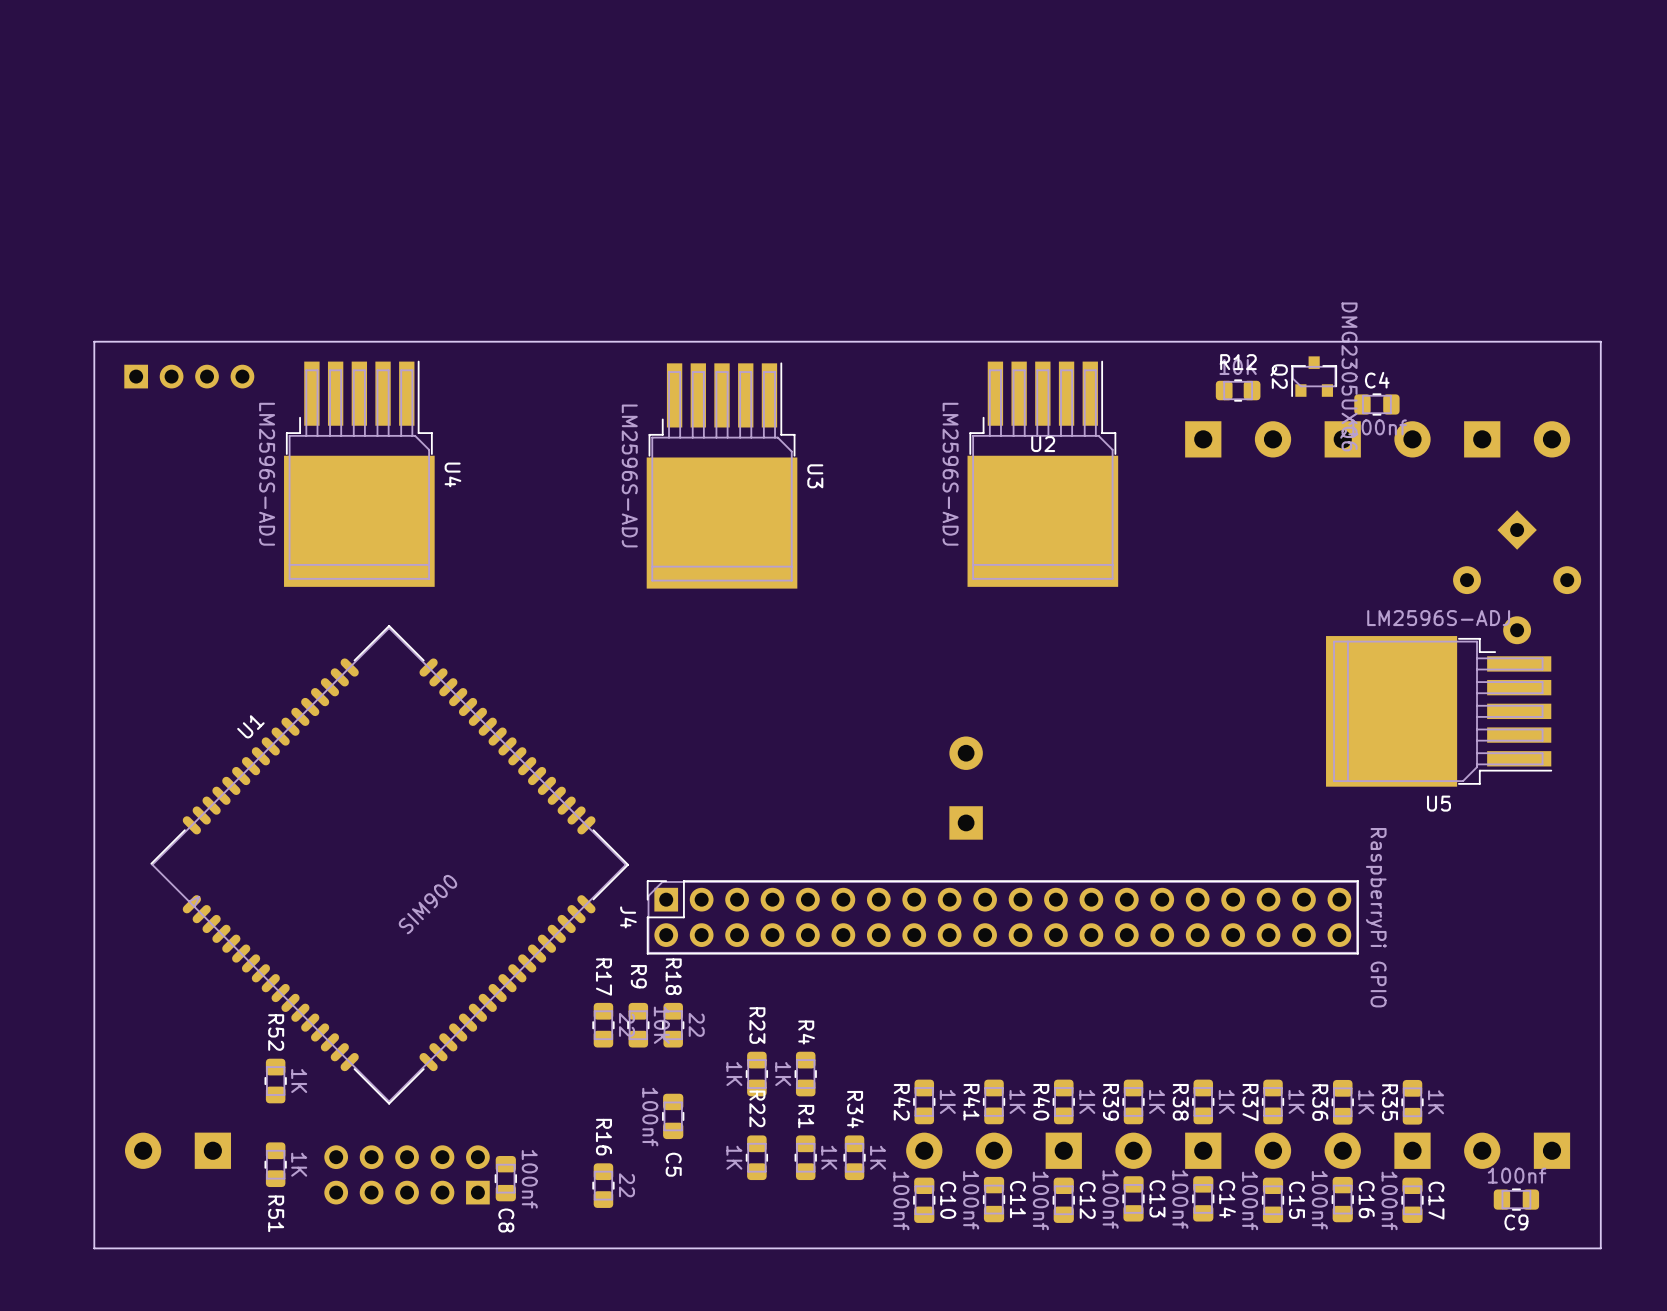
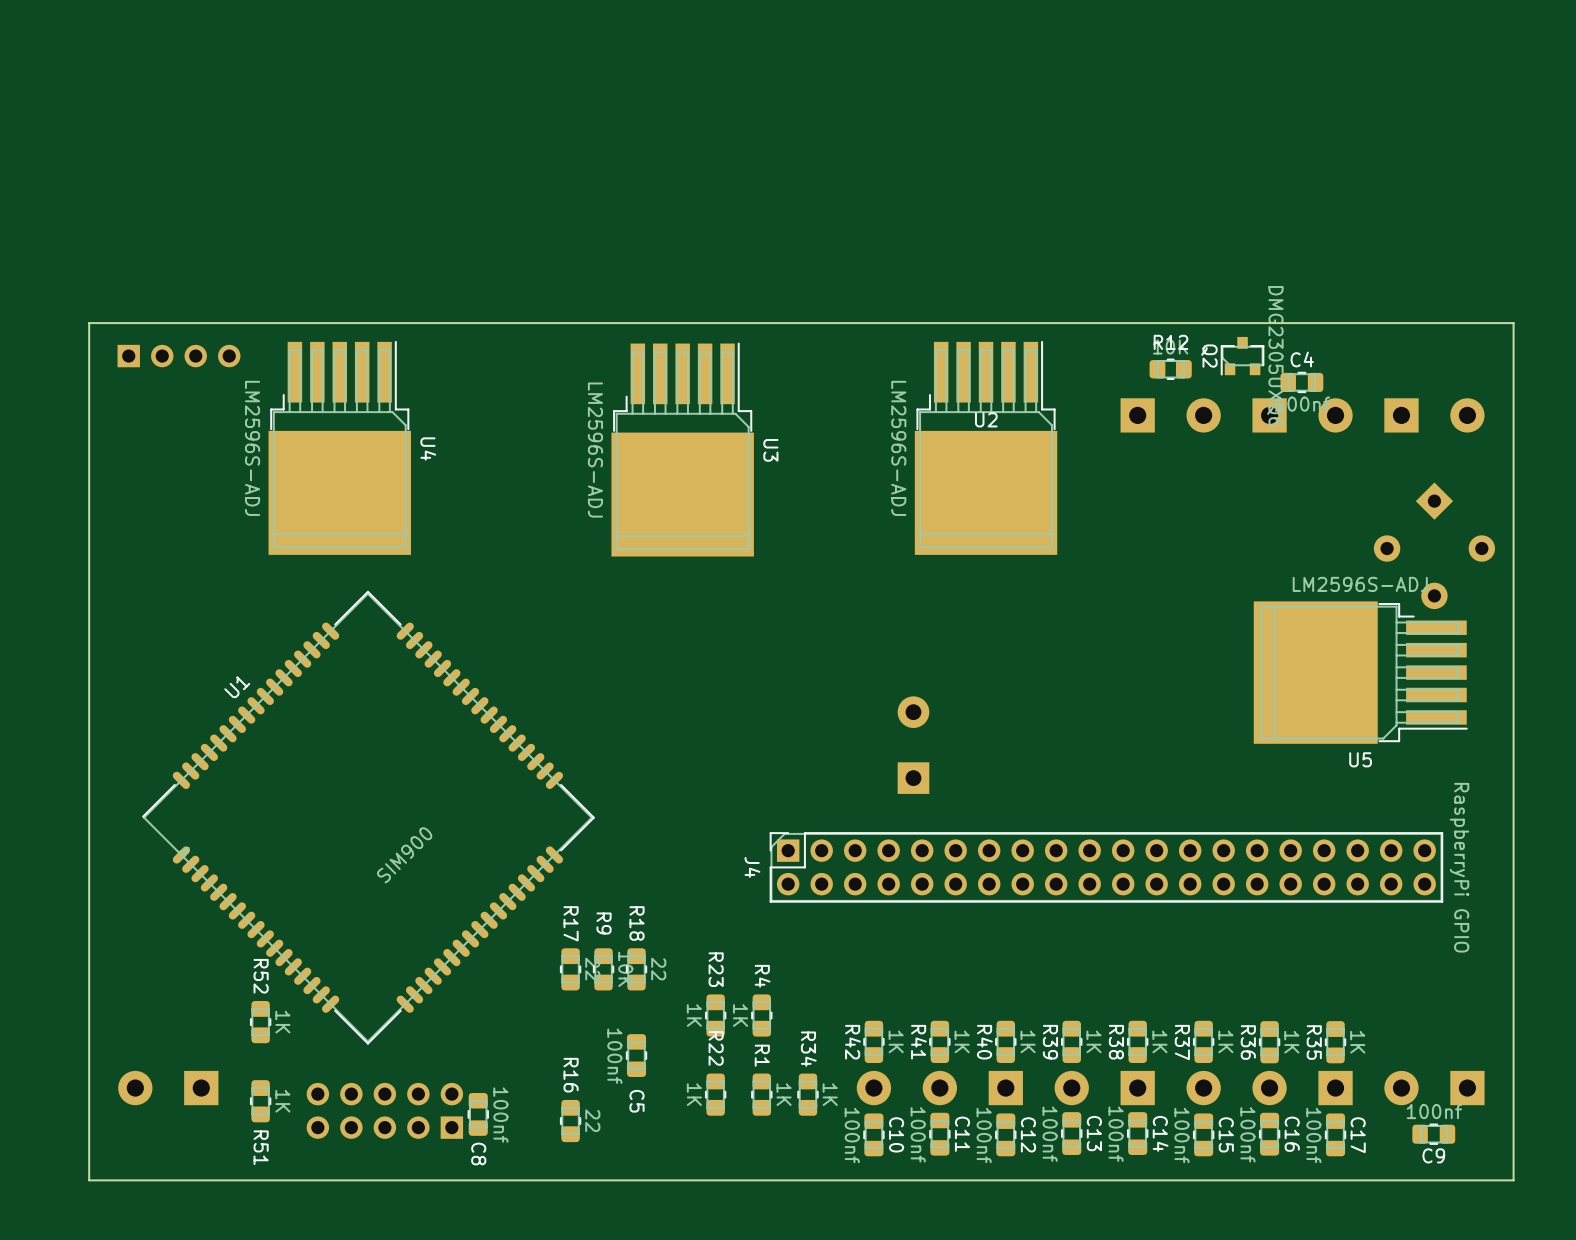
J4 position: (1002, 917) -> (1106, 867)

